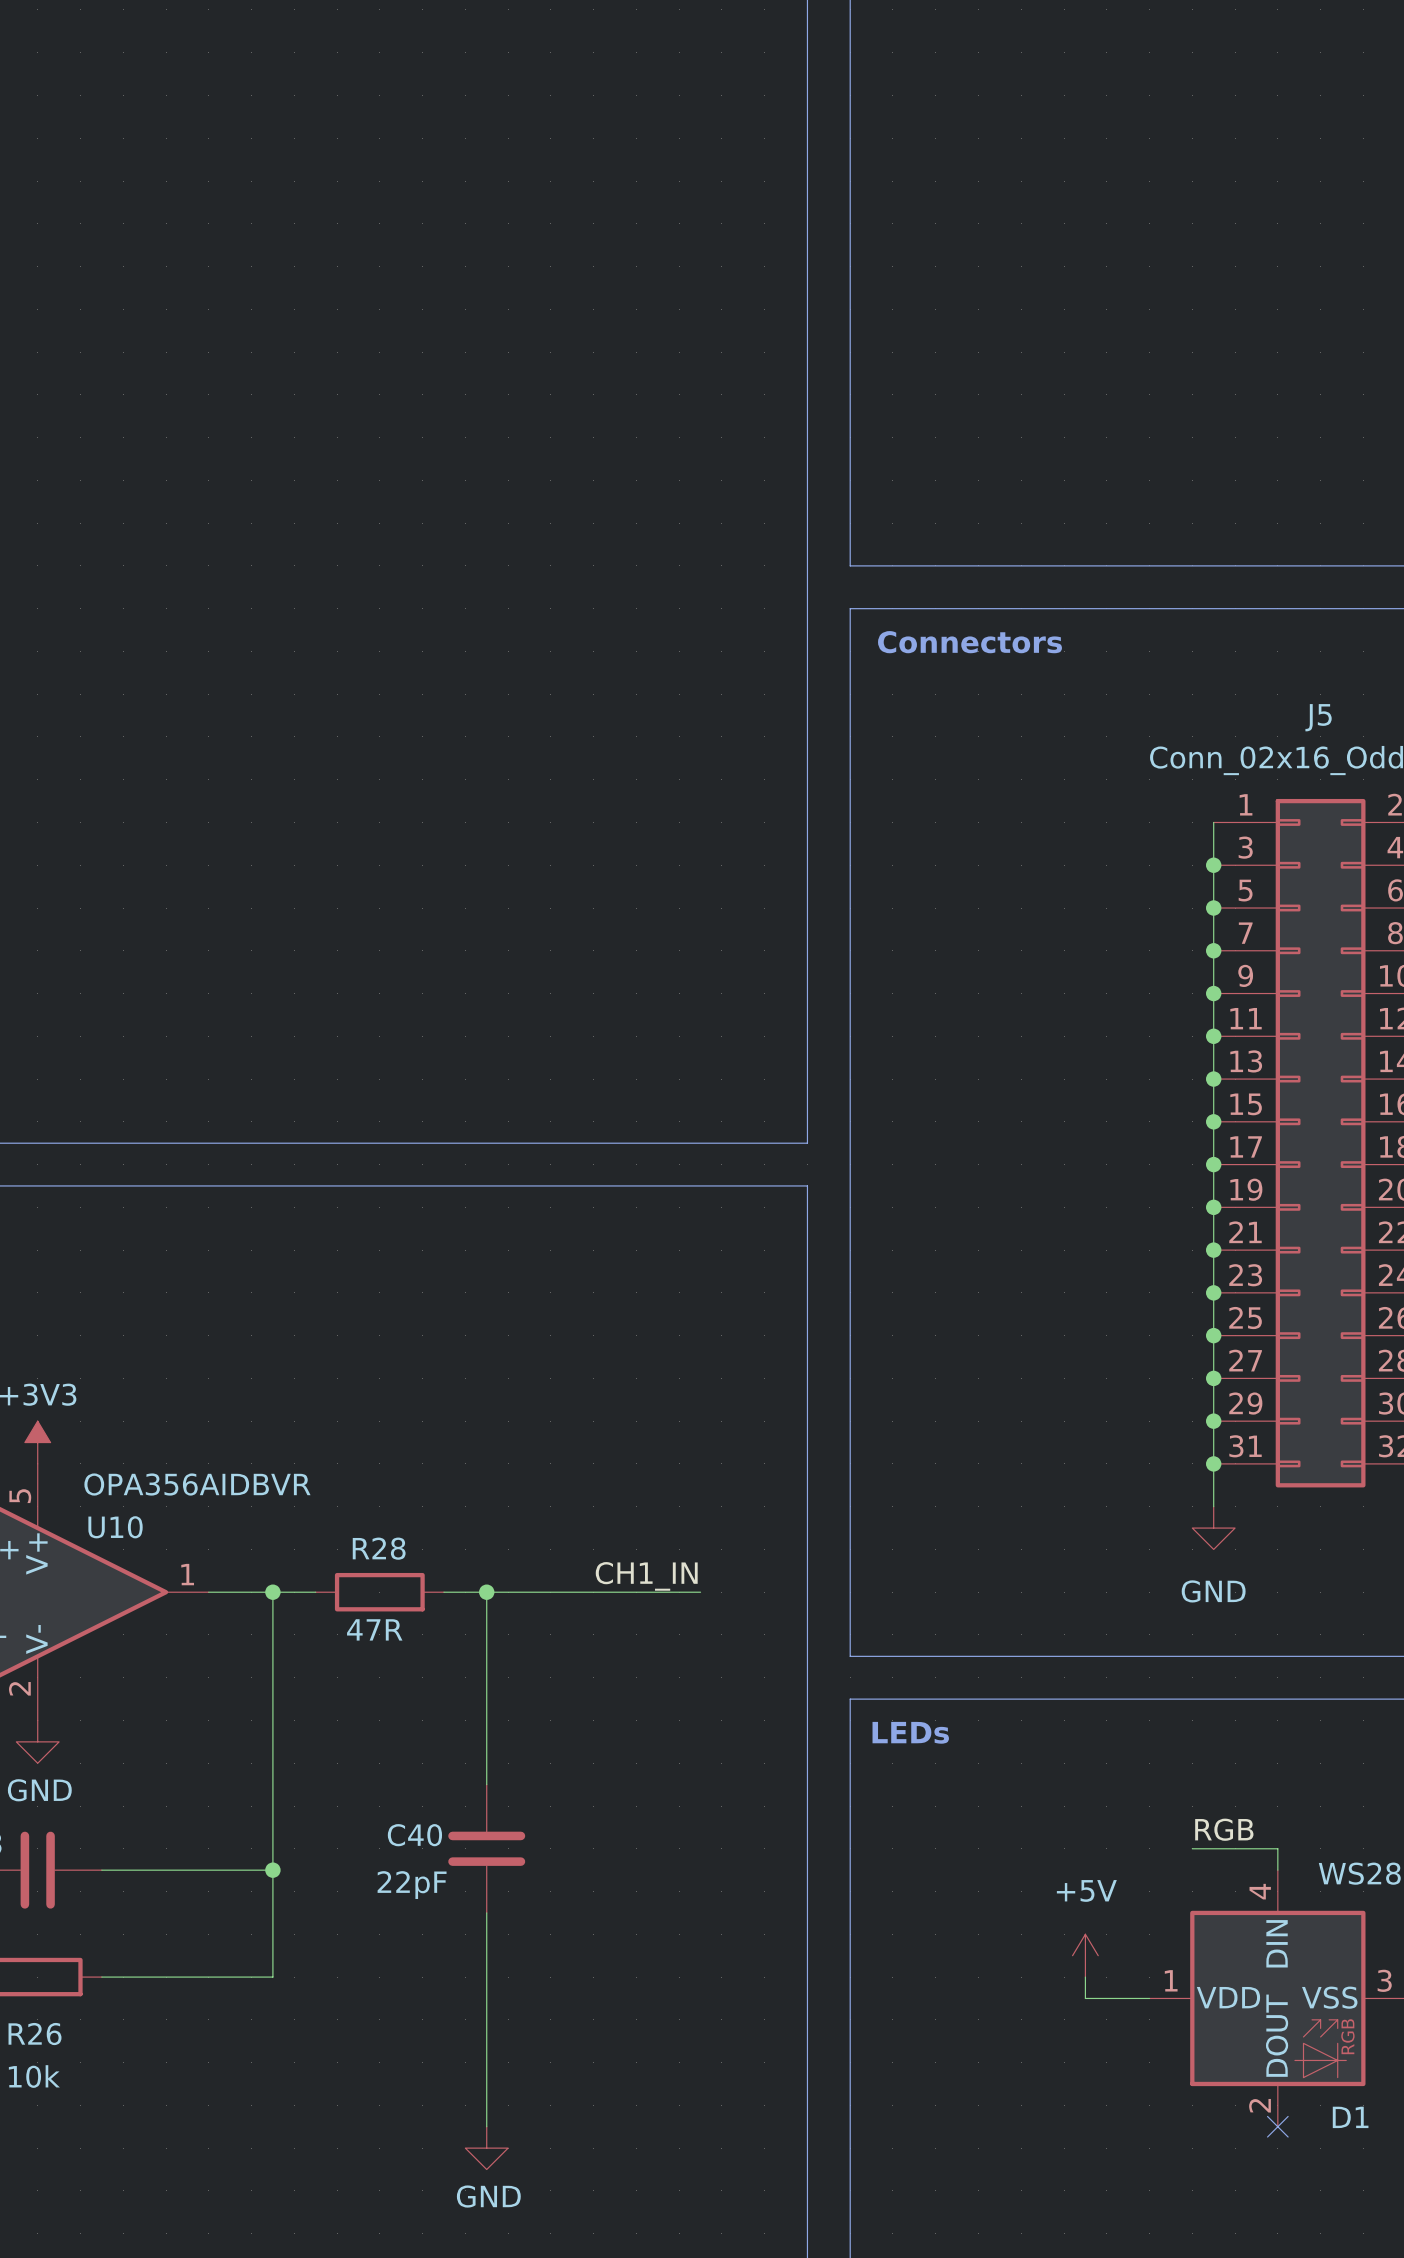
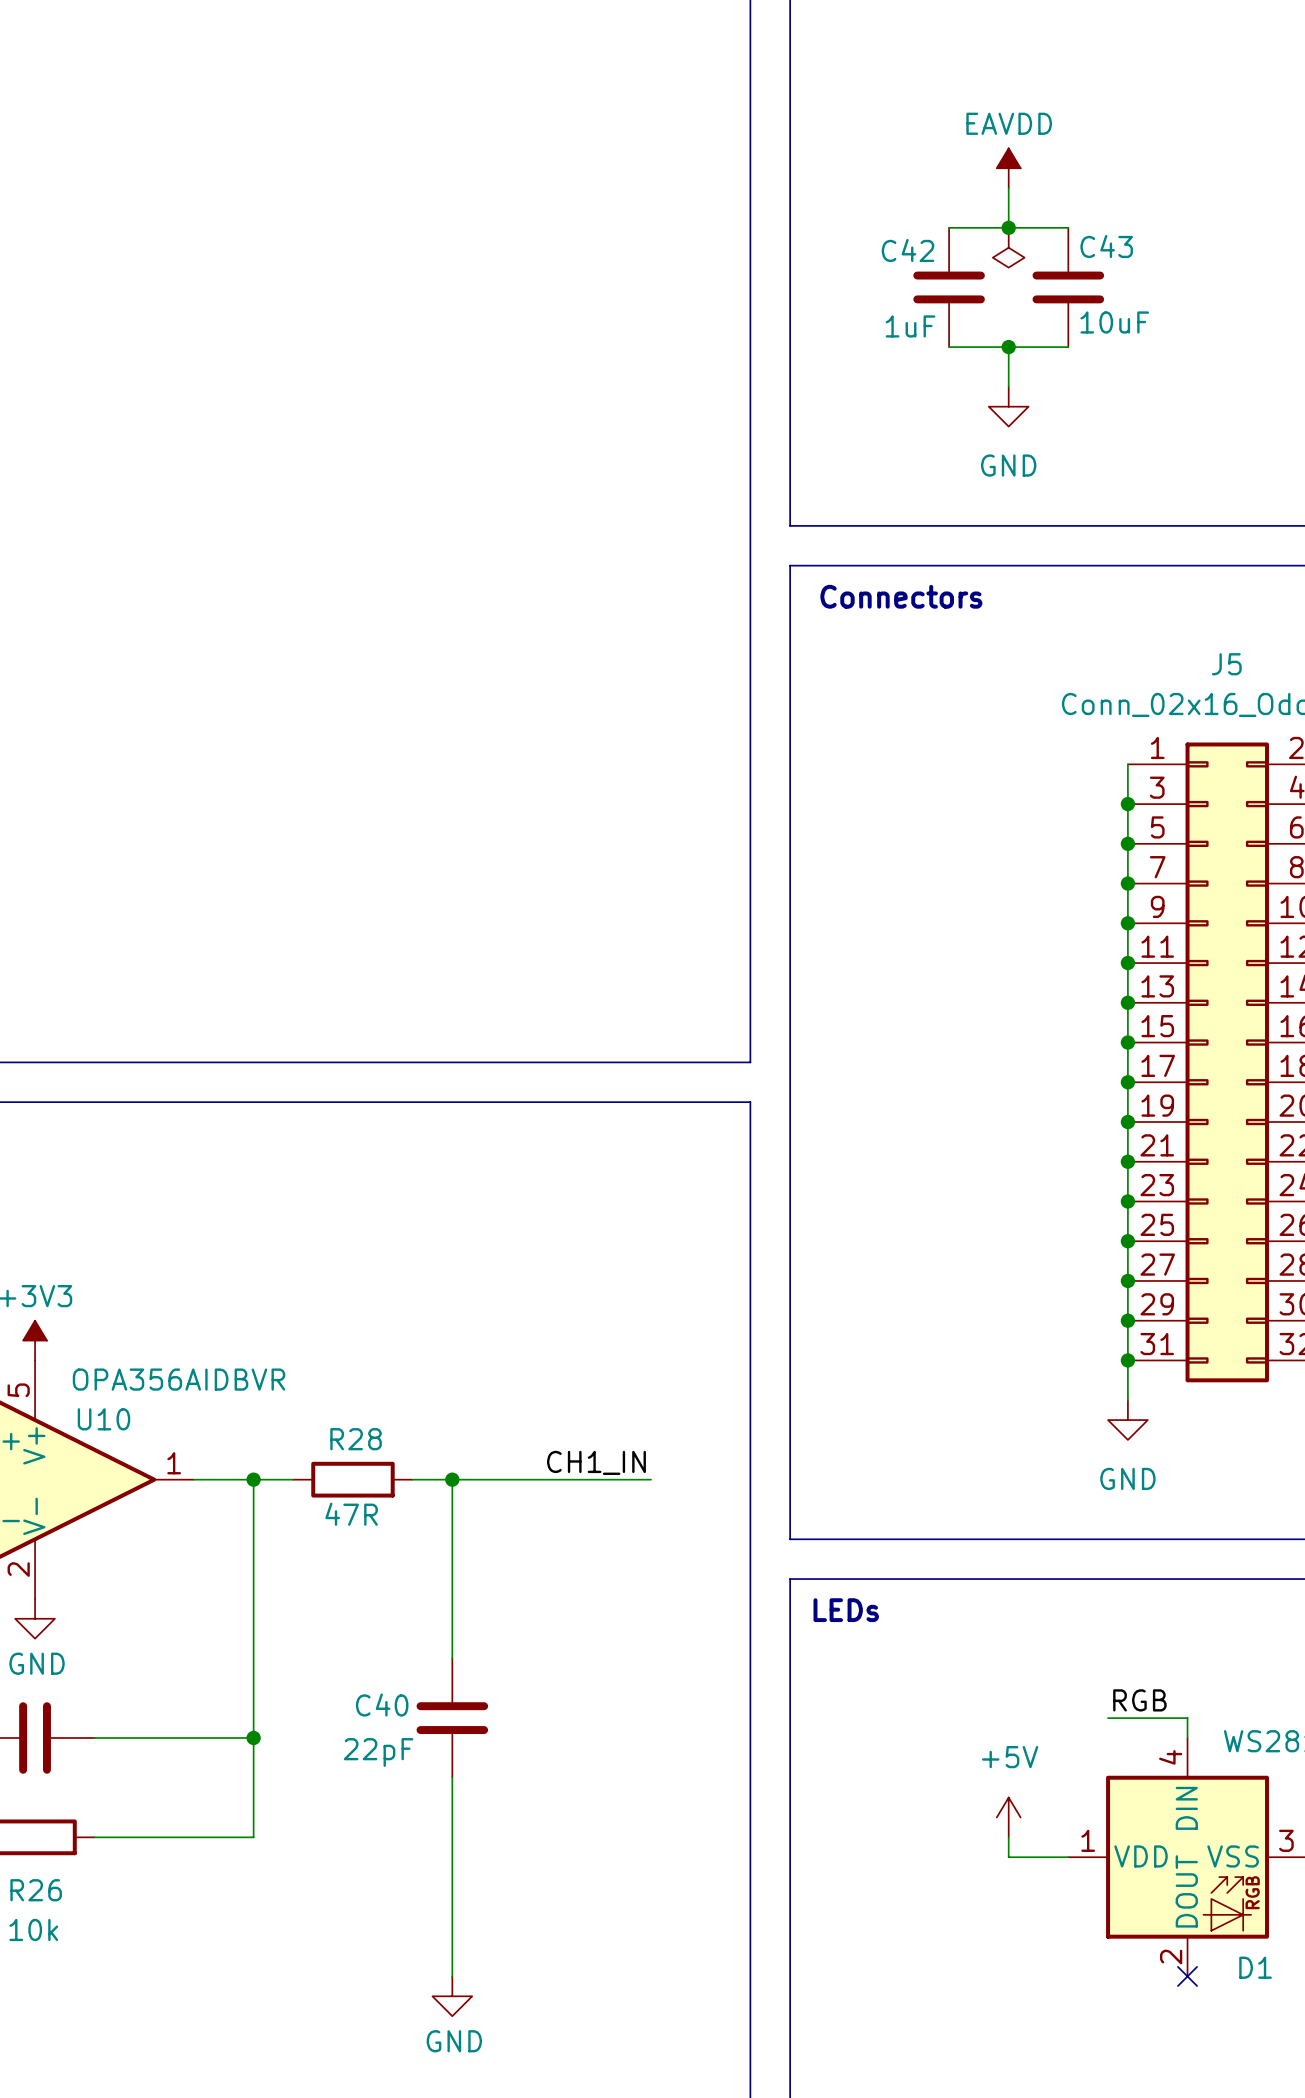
power symbol: none -> EAVDD (1008, 168)
wire: none -> (1008, 188) (1008, 227)
wire: none -> (949, 227) (1068, 227)
junction: none -> (1008, 227)
power symbol: none -> (1008, 247)
C42: none -> 1uF (949, 287)
C43: none -> 10uF (1068, 287)
wire: none -> (949, 347) (1068, 347)
wire: none -> (1008, 347) (1008, 386)
junction: none -> (1008, 347)
power symbol: none -> GND (1008, 406)

